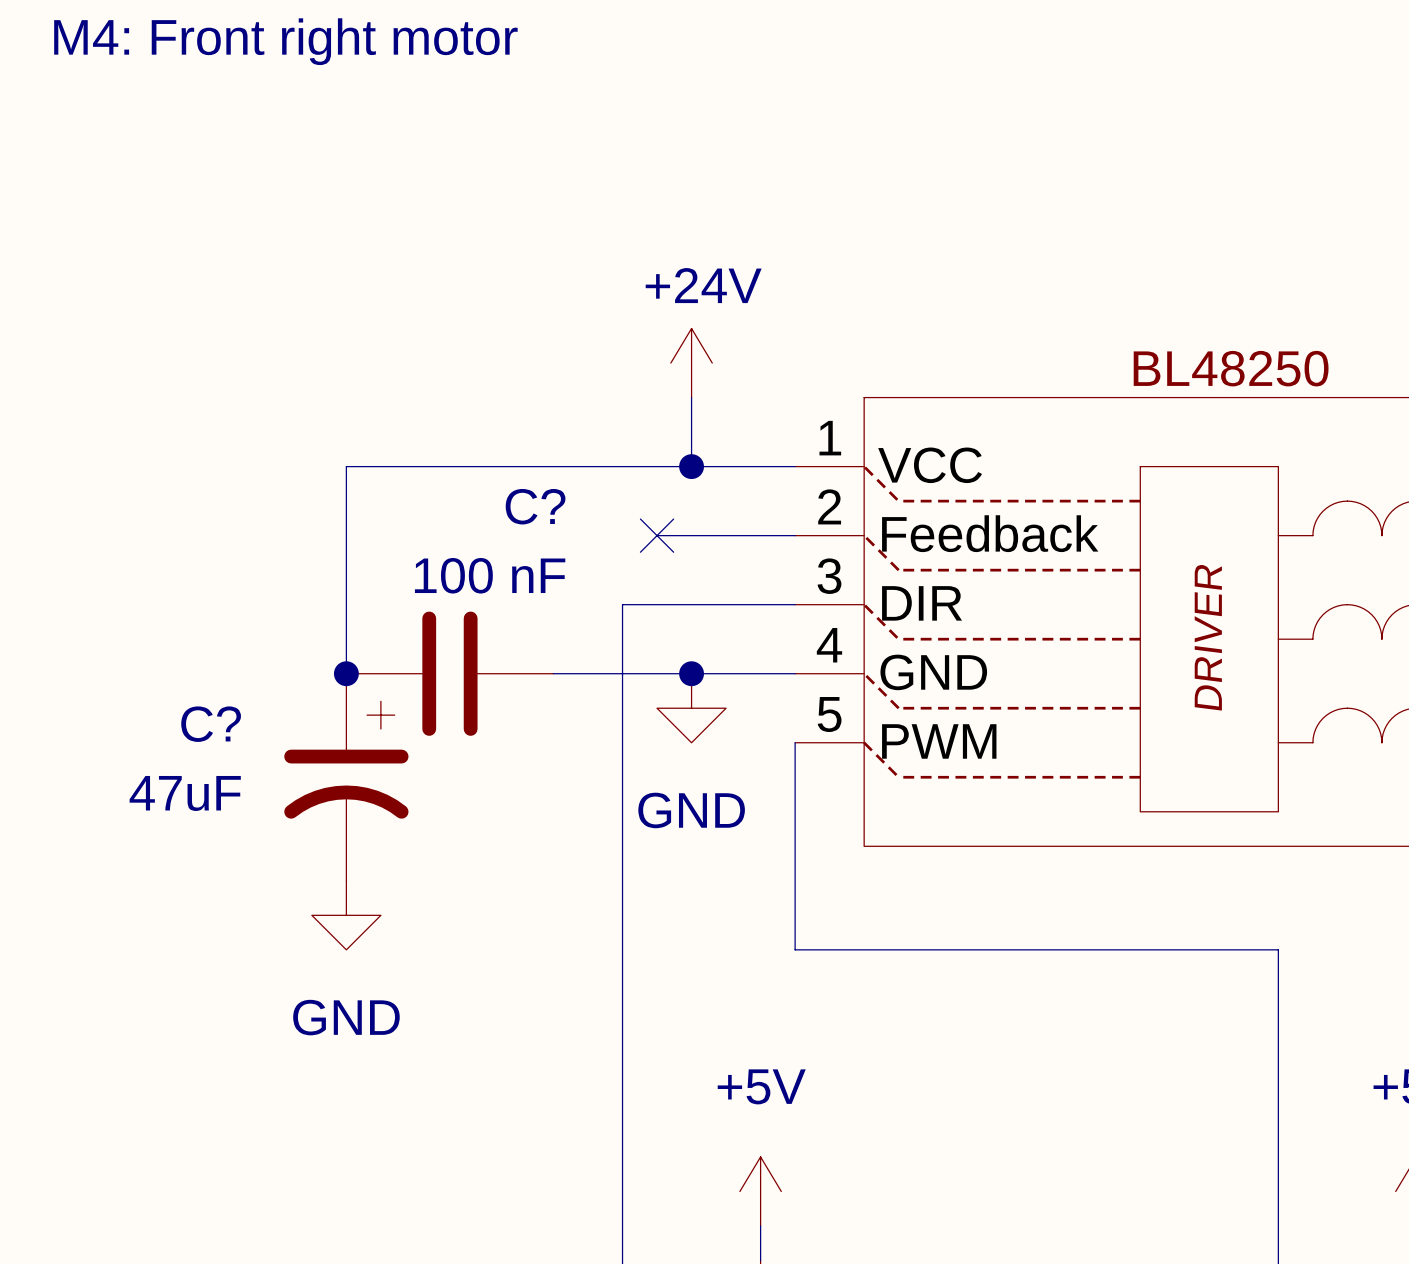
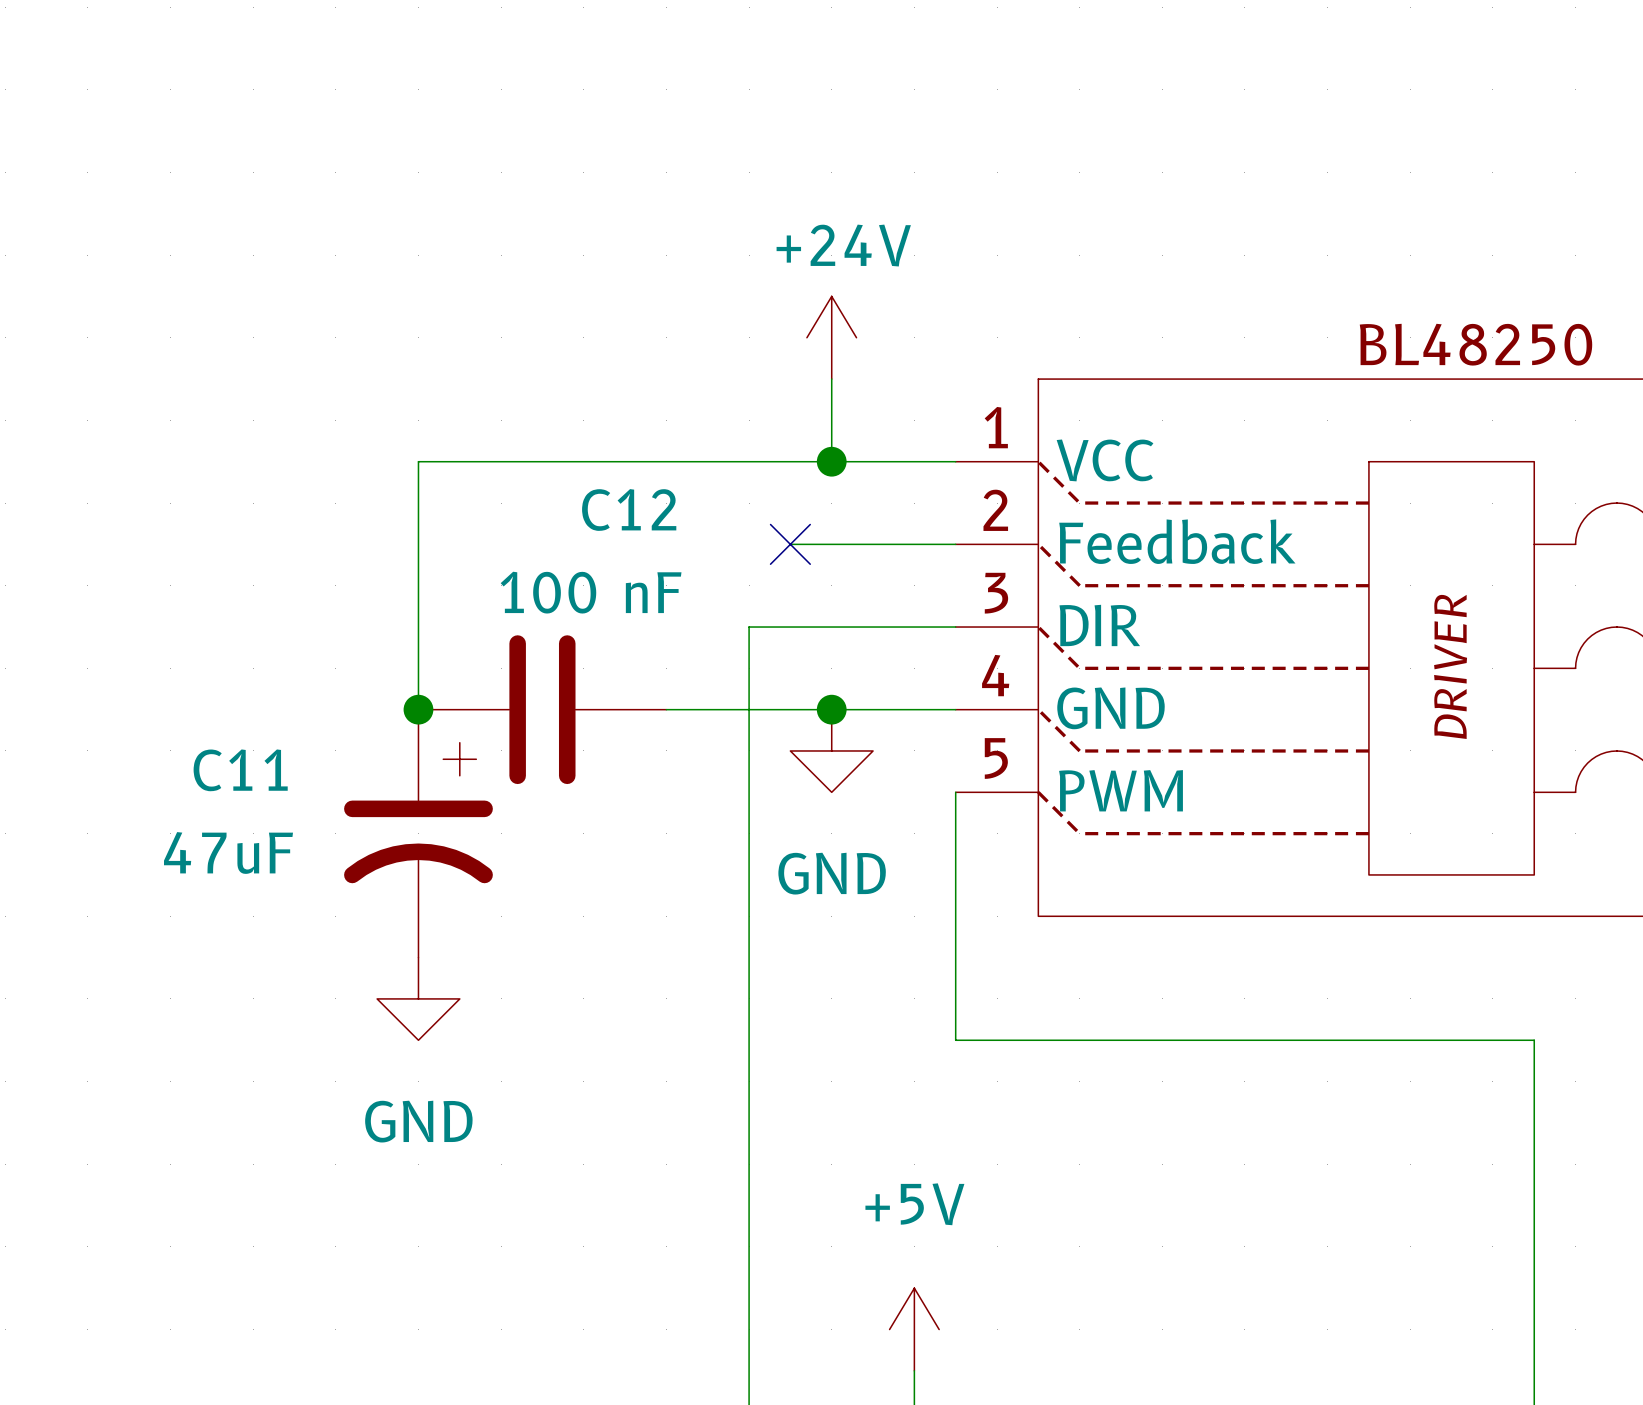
C? name: C? (535, 506) -> C12 (629, 509)
C? name: C? (211, 724) -> C11 (240, 770)

